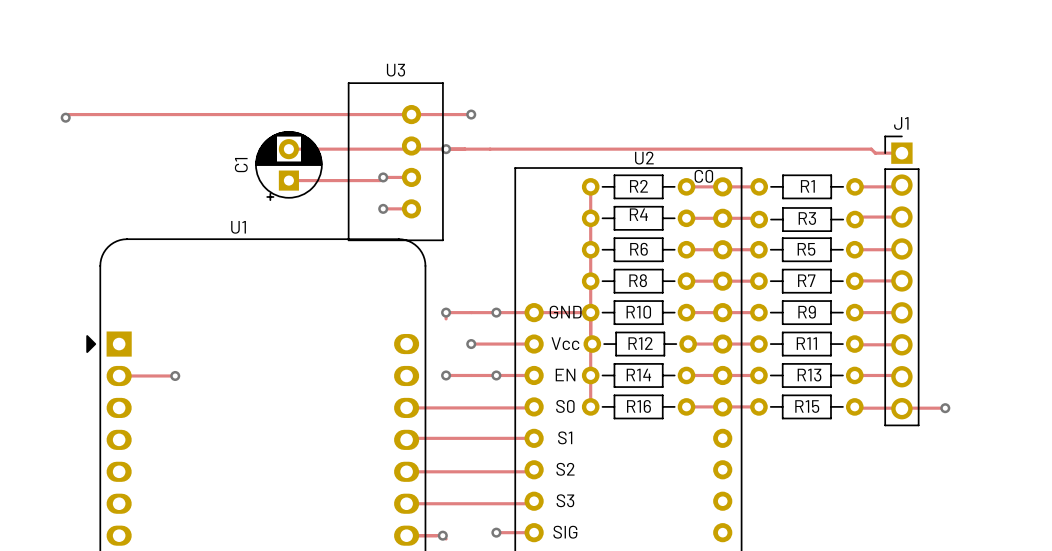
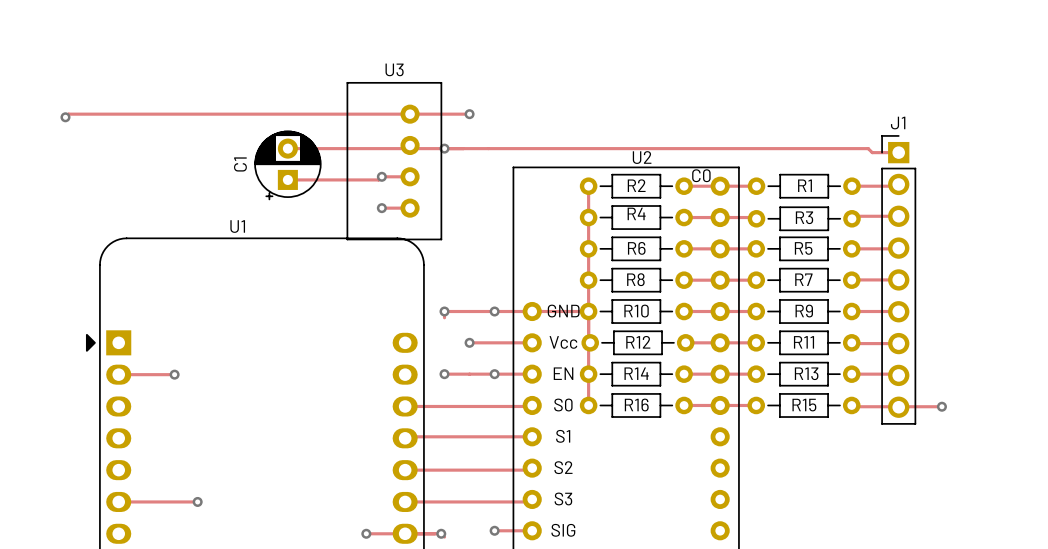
track: none -> (118, 501) (197, 501)
via: none -> (197, 501)
track: none -> (366, 533) (405, 533)
via: none -> (366, 533)

